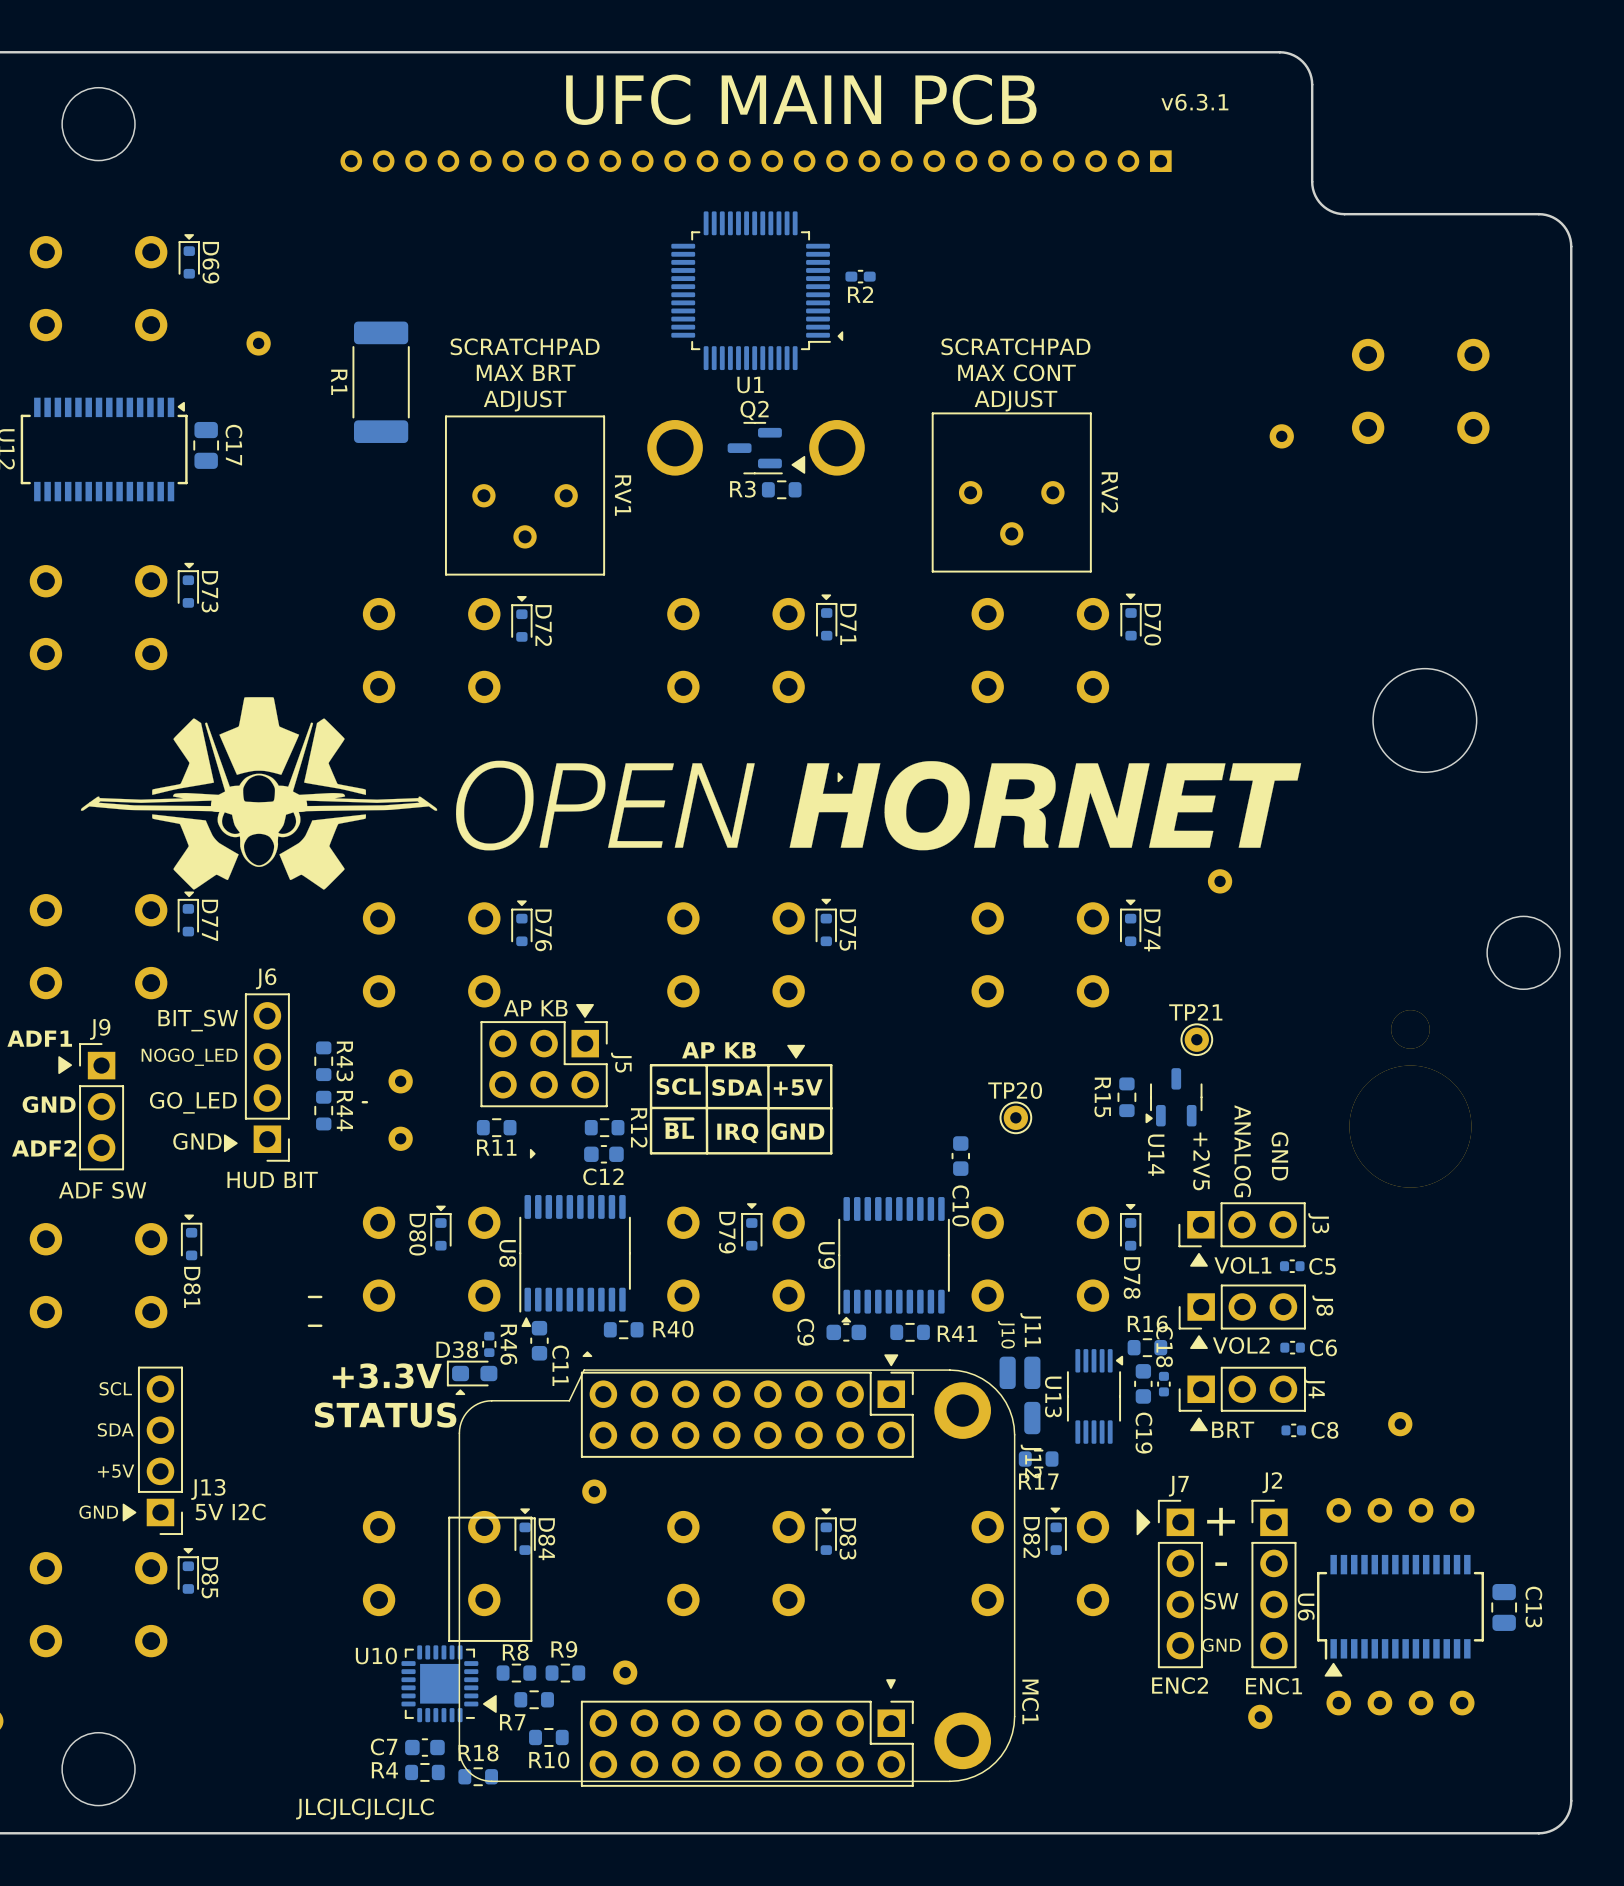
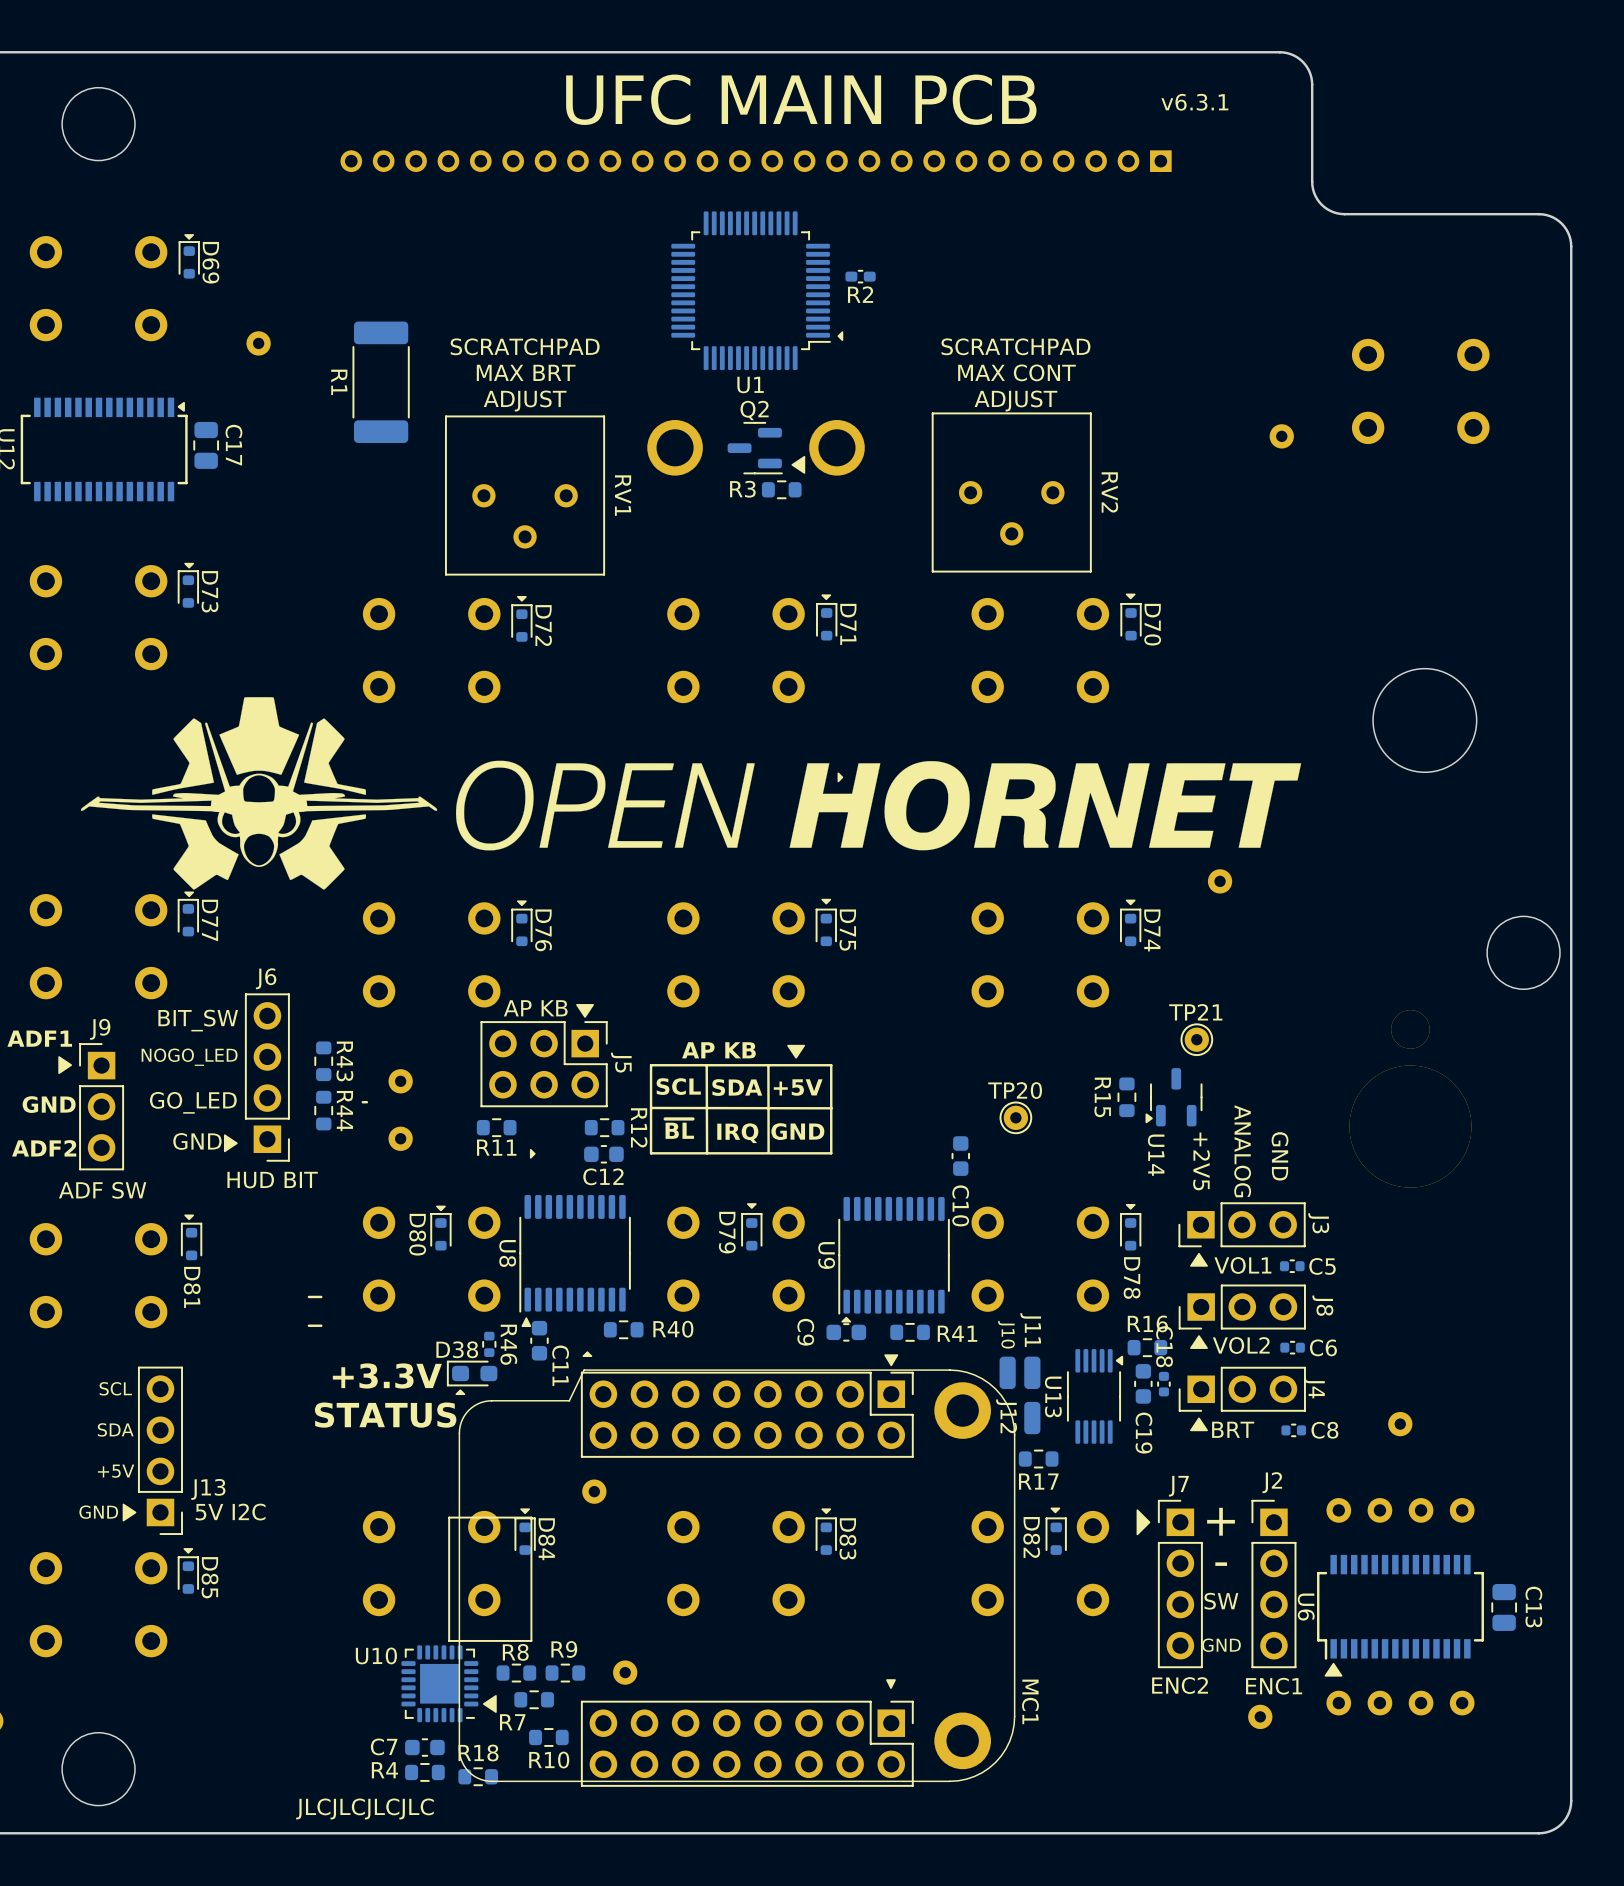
J12 name position: J12 (1031, 1461) -> J12 (1006, 1416)

